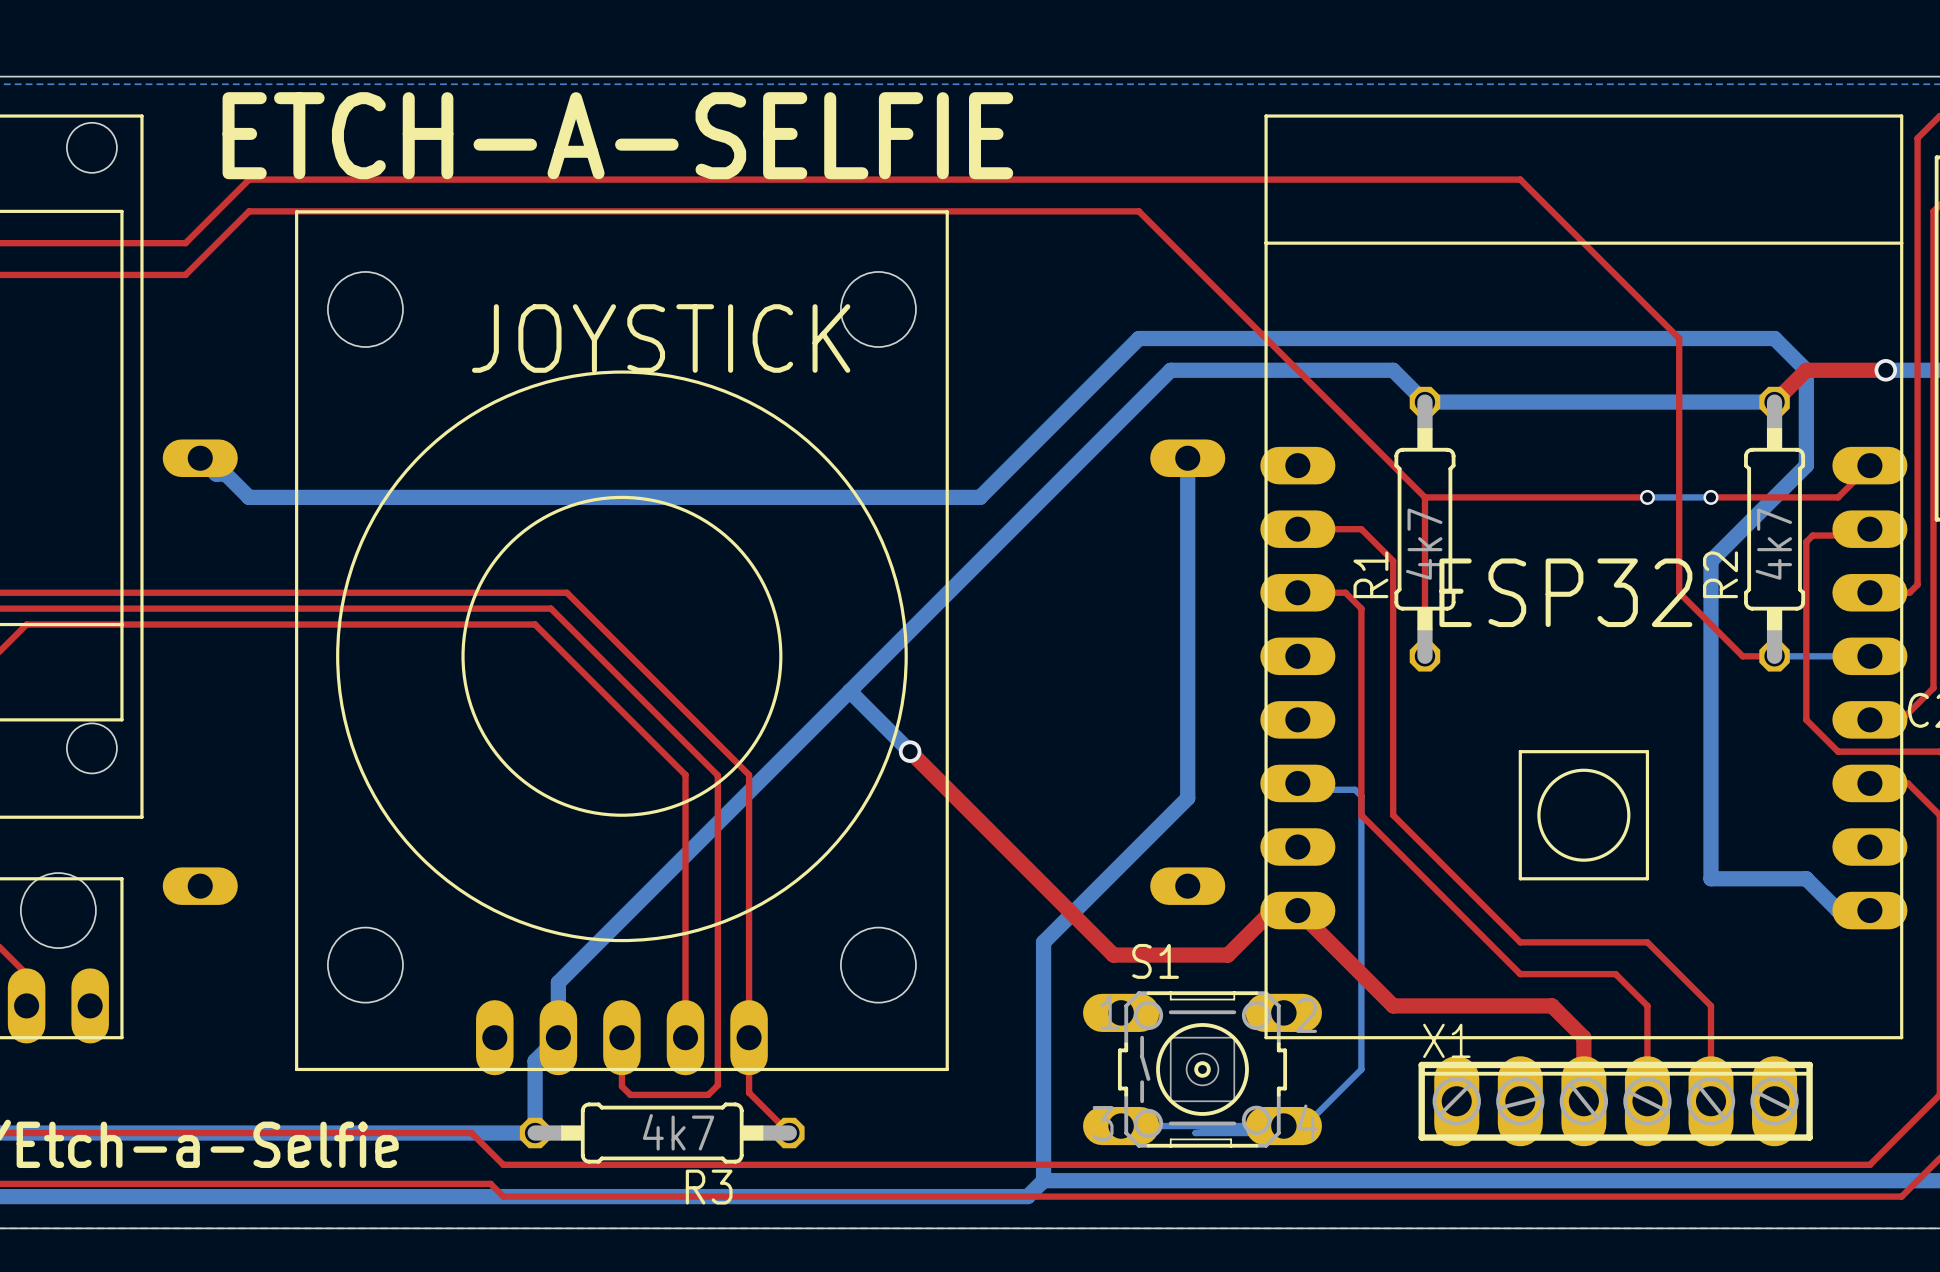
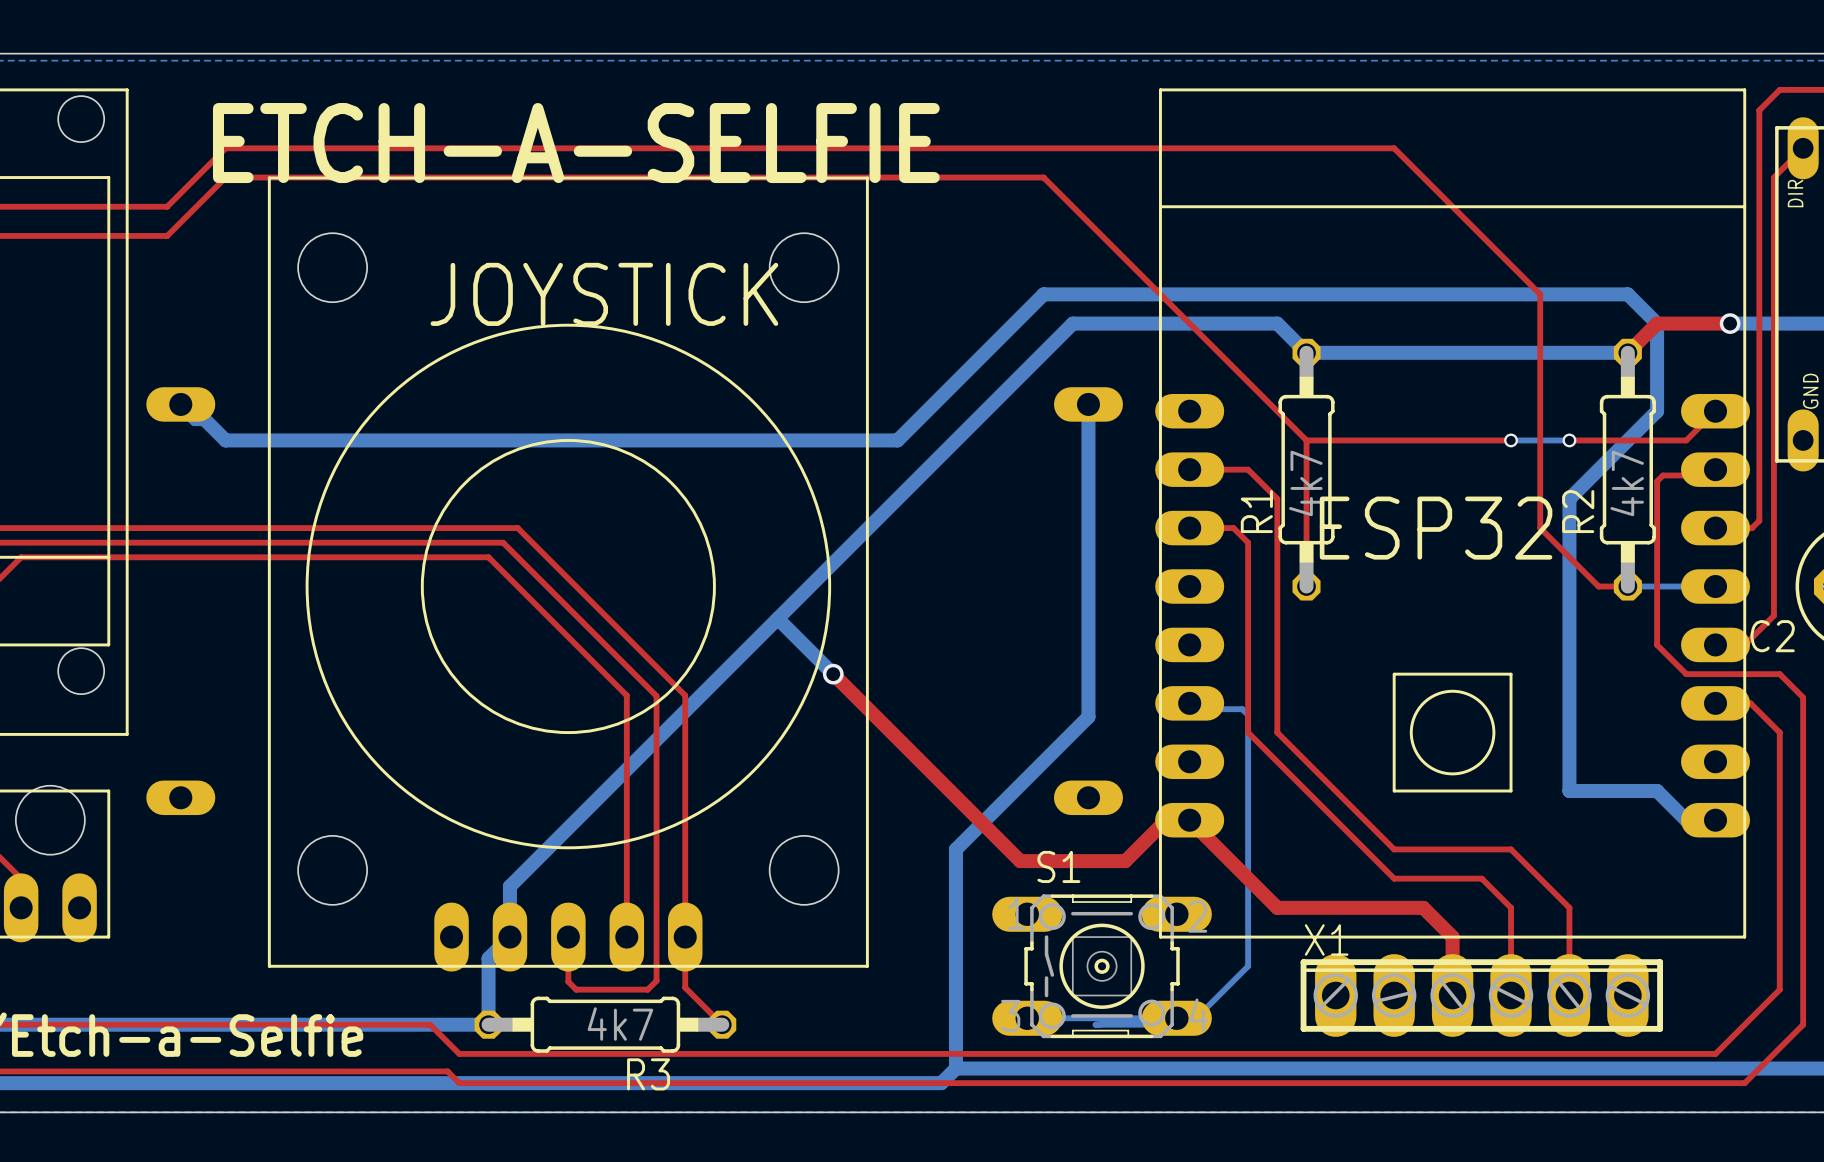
text position: ETCH-A-SELFIE (617, 135) -> ETCH-A-SELFIE (576, 143)

